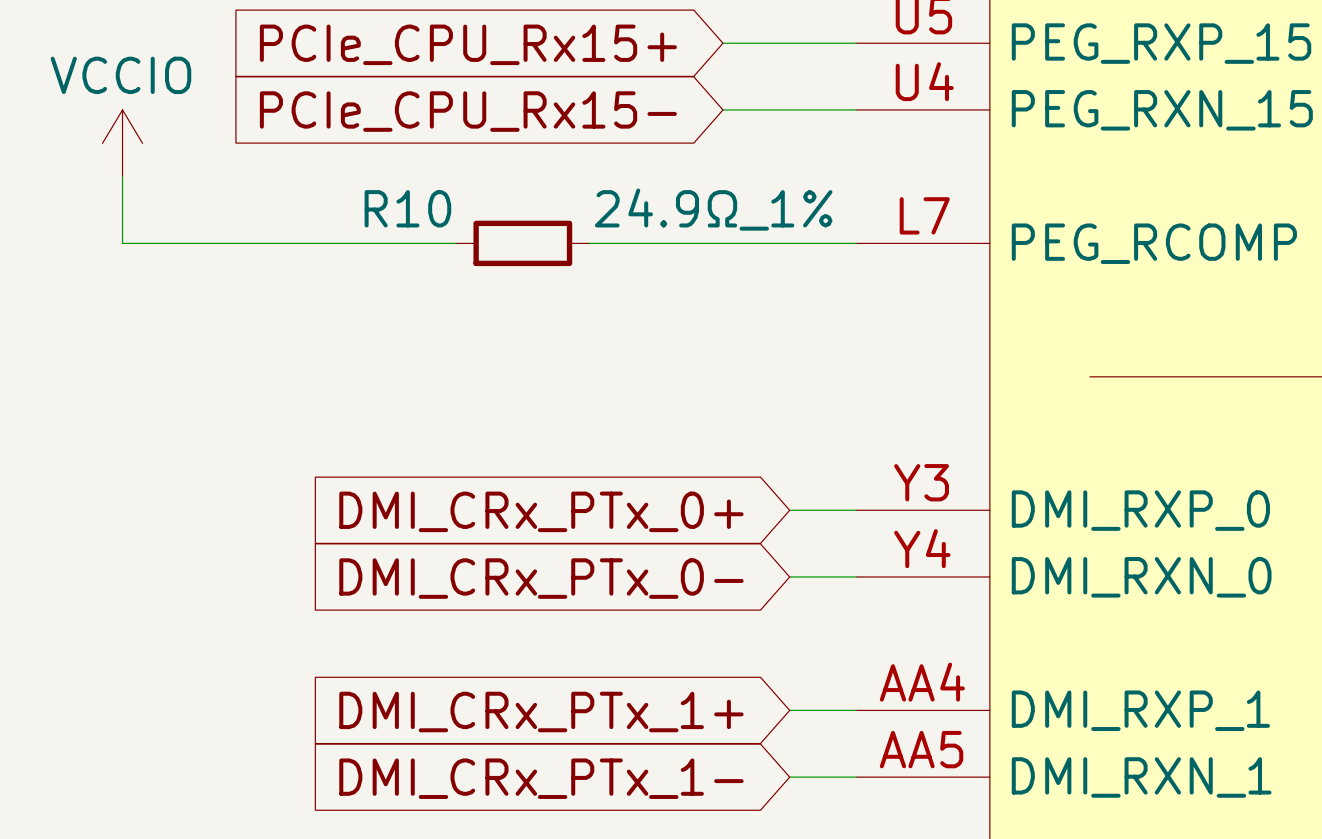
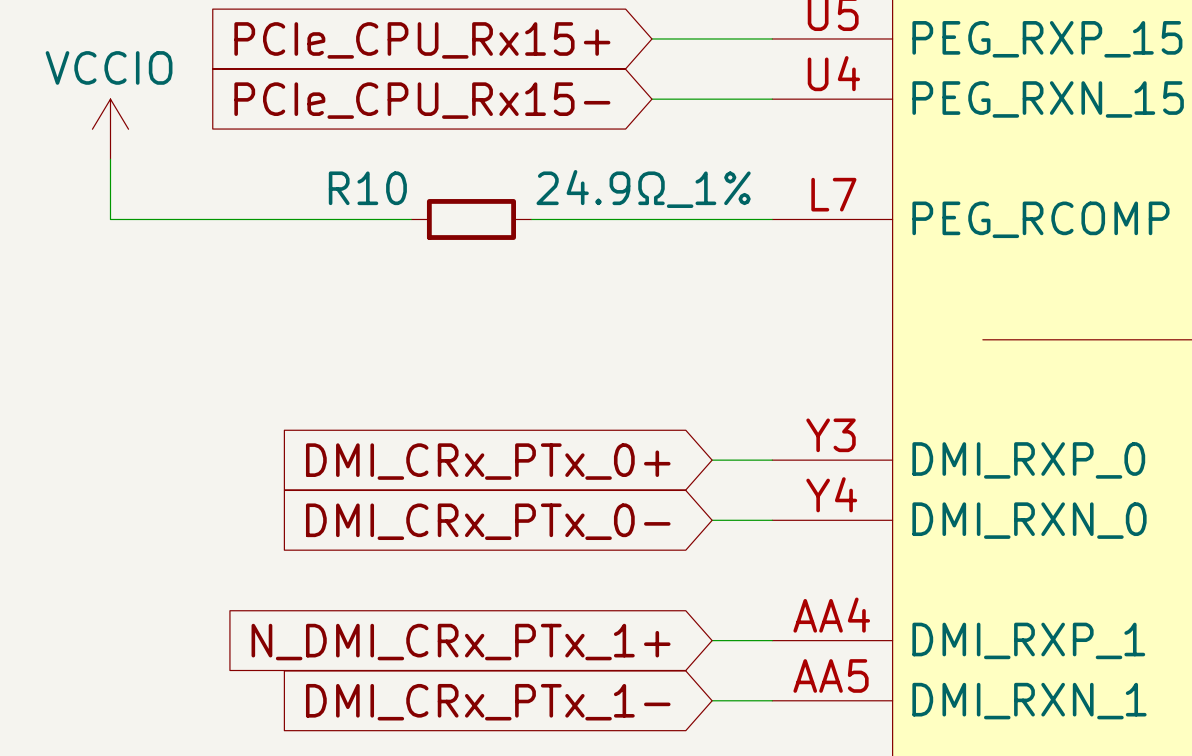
global label: DMI_CRx_PTx_1+ (541, 712) -> N_DMI_CRx_PTx_1+ (461, 642)

